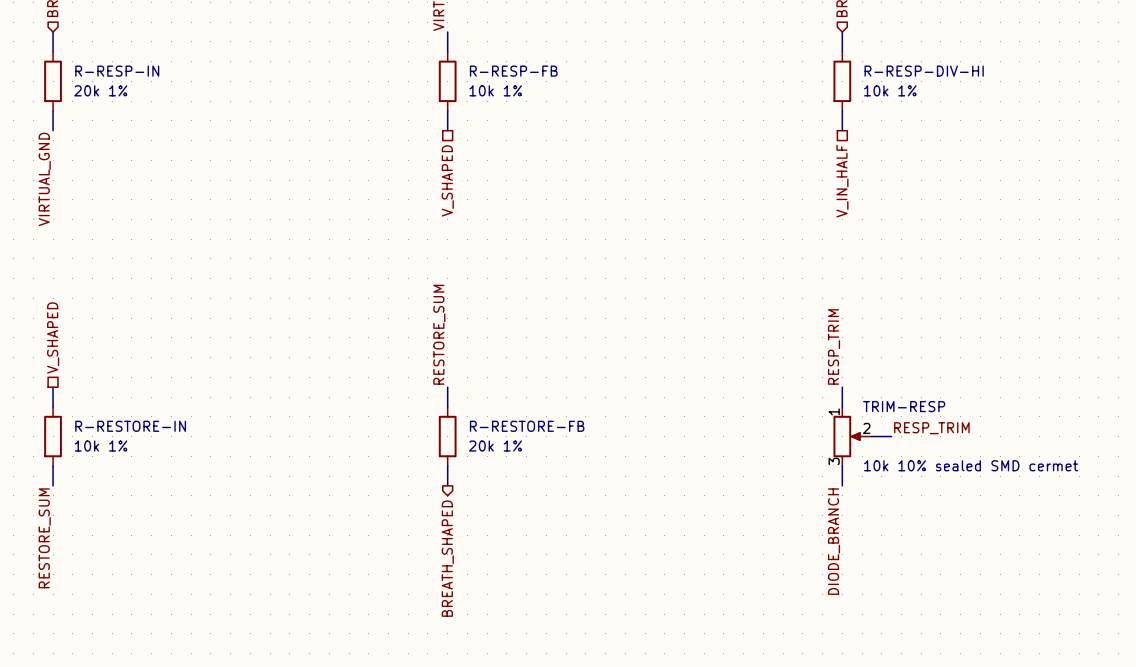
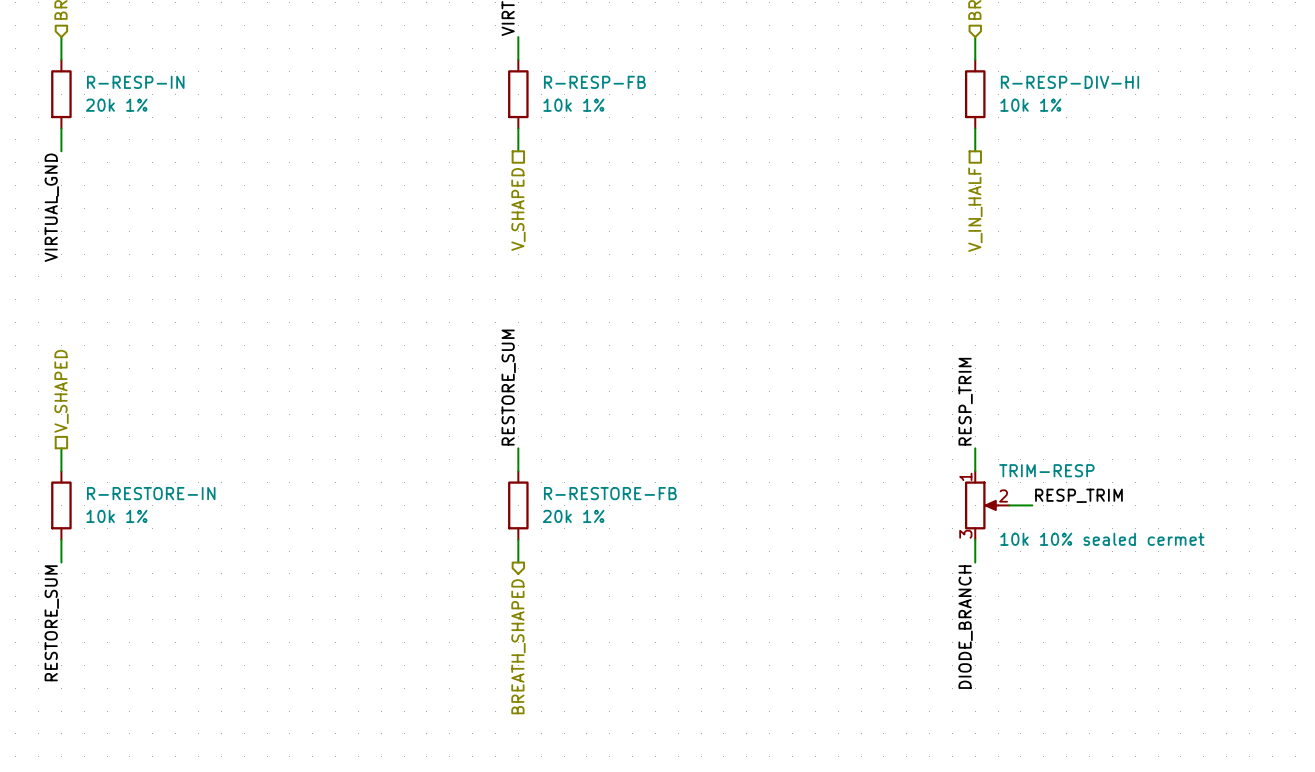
TRIM-RESP value: 10k 10% sealed SMD cermet (971, 465) -> 10k 10% sealed cermet (1102, 539)

